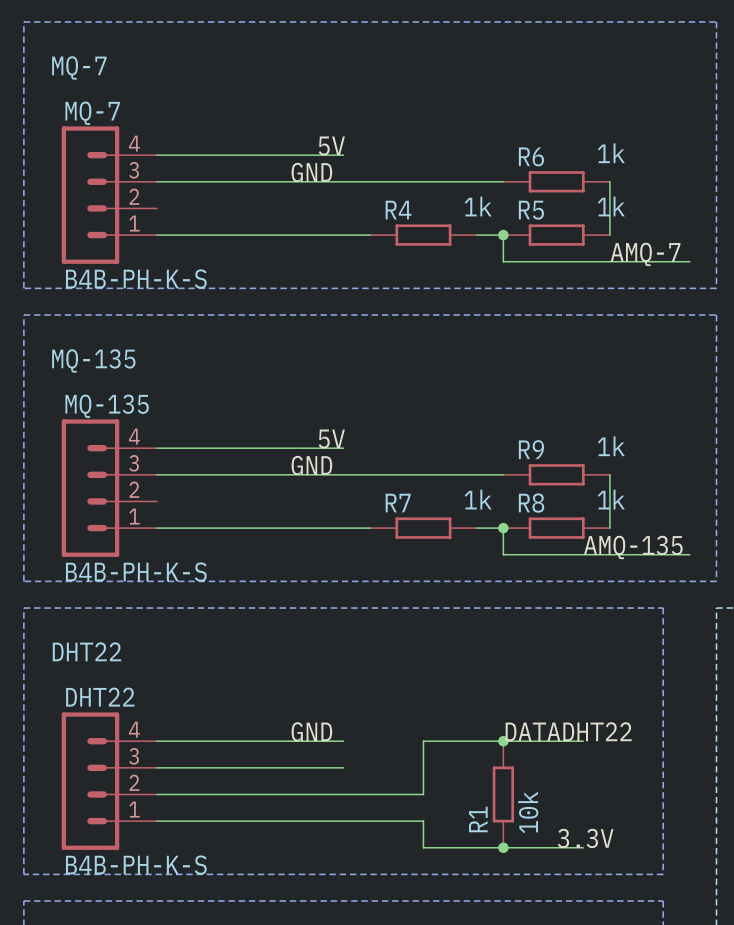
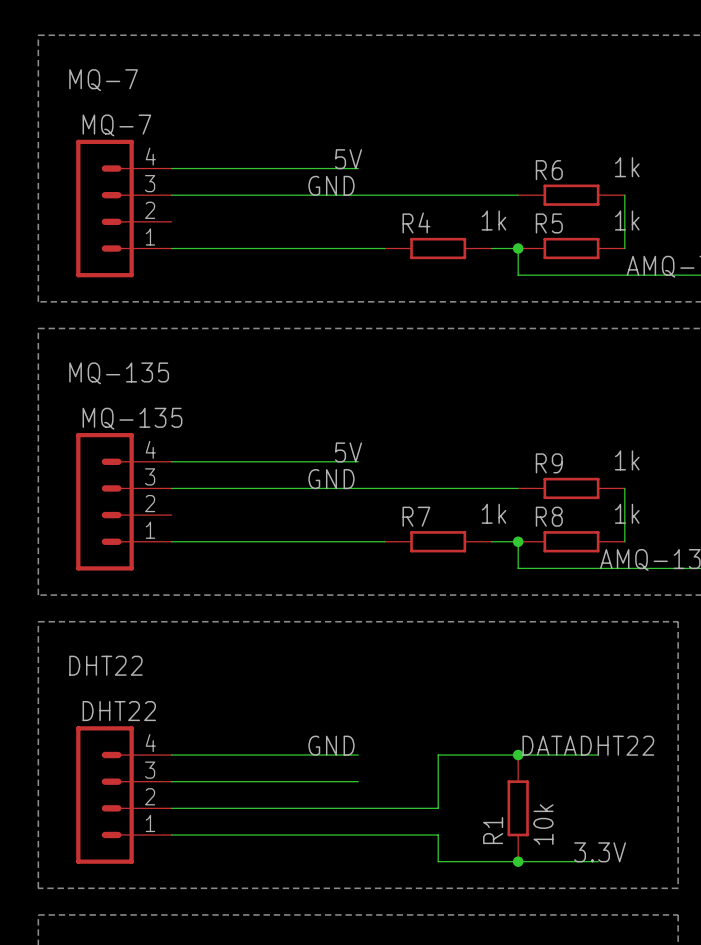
MQ-7 value: B4B-PH-K-S (136, 279) -> none
MQ-135 value: B4B-PH-K-S (136, 572) -> none
DHT22 value: B4B-PH-K-S (136, 865) -> none

